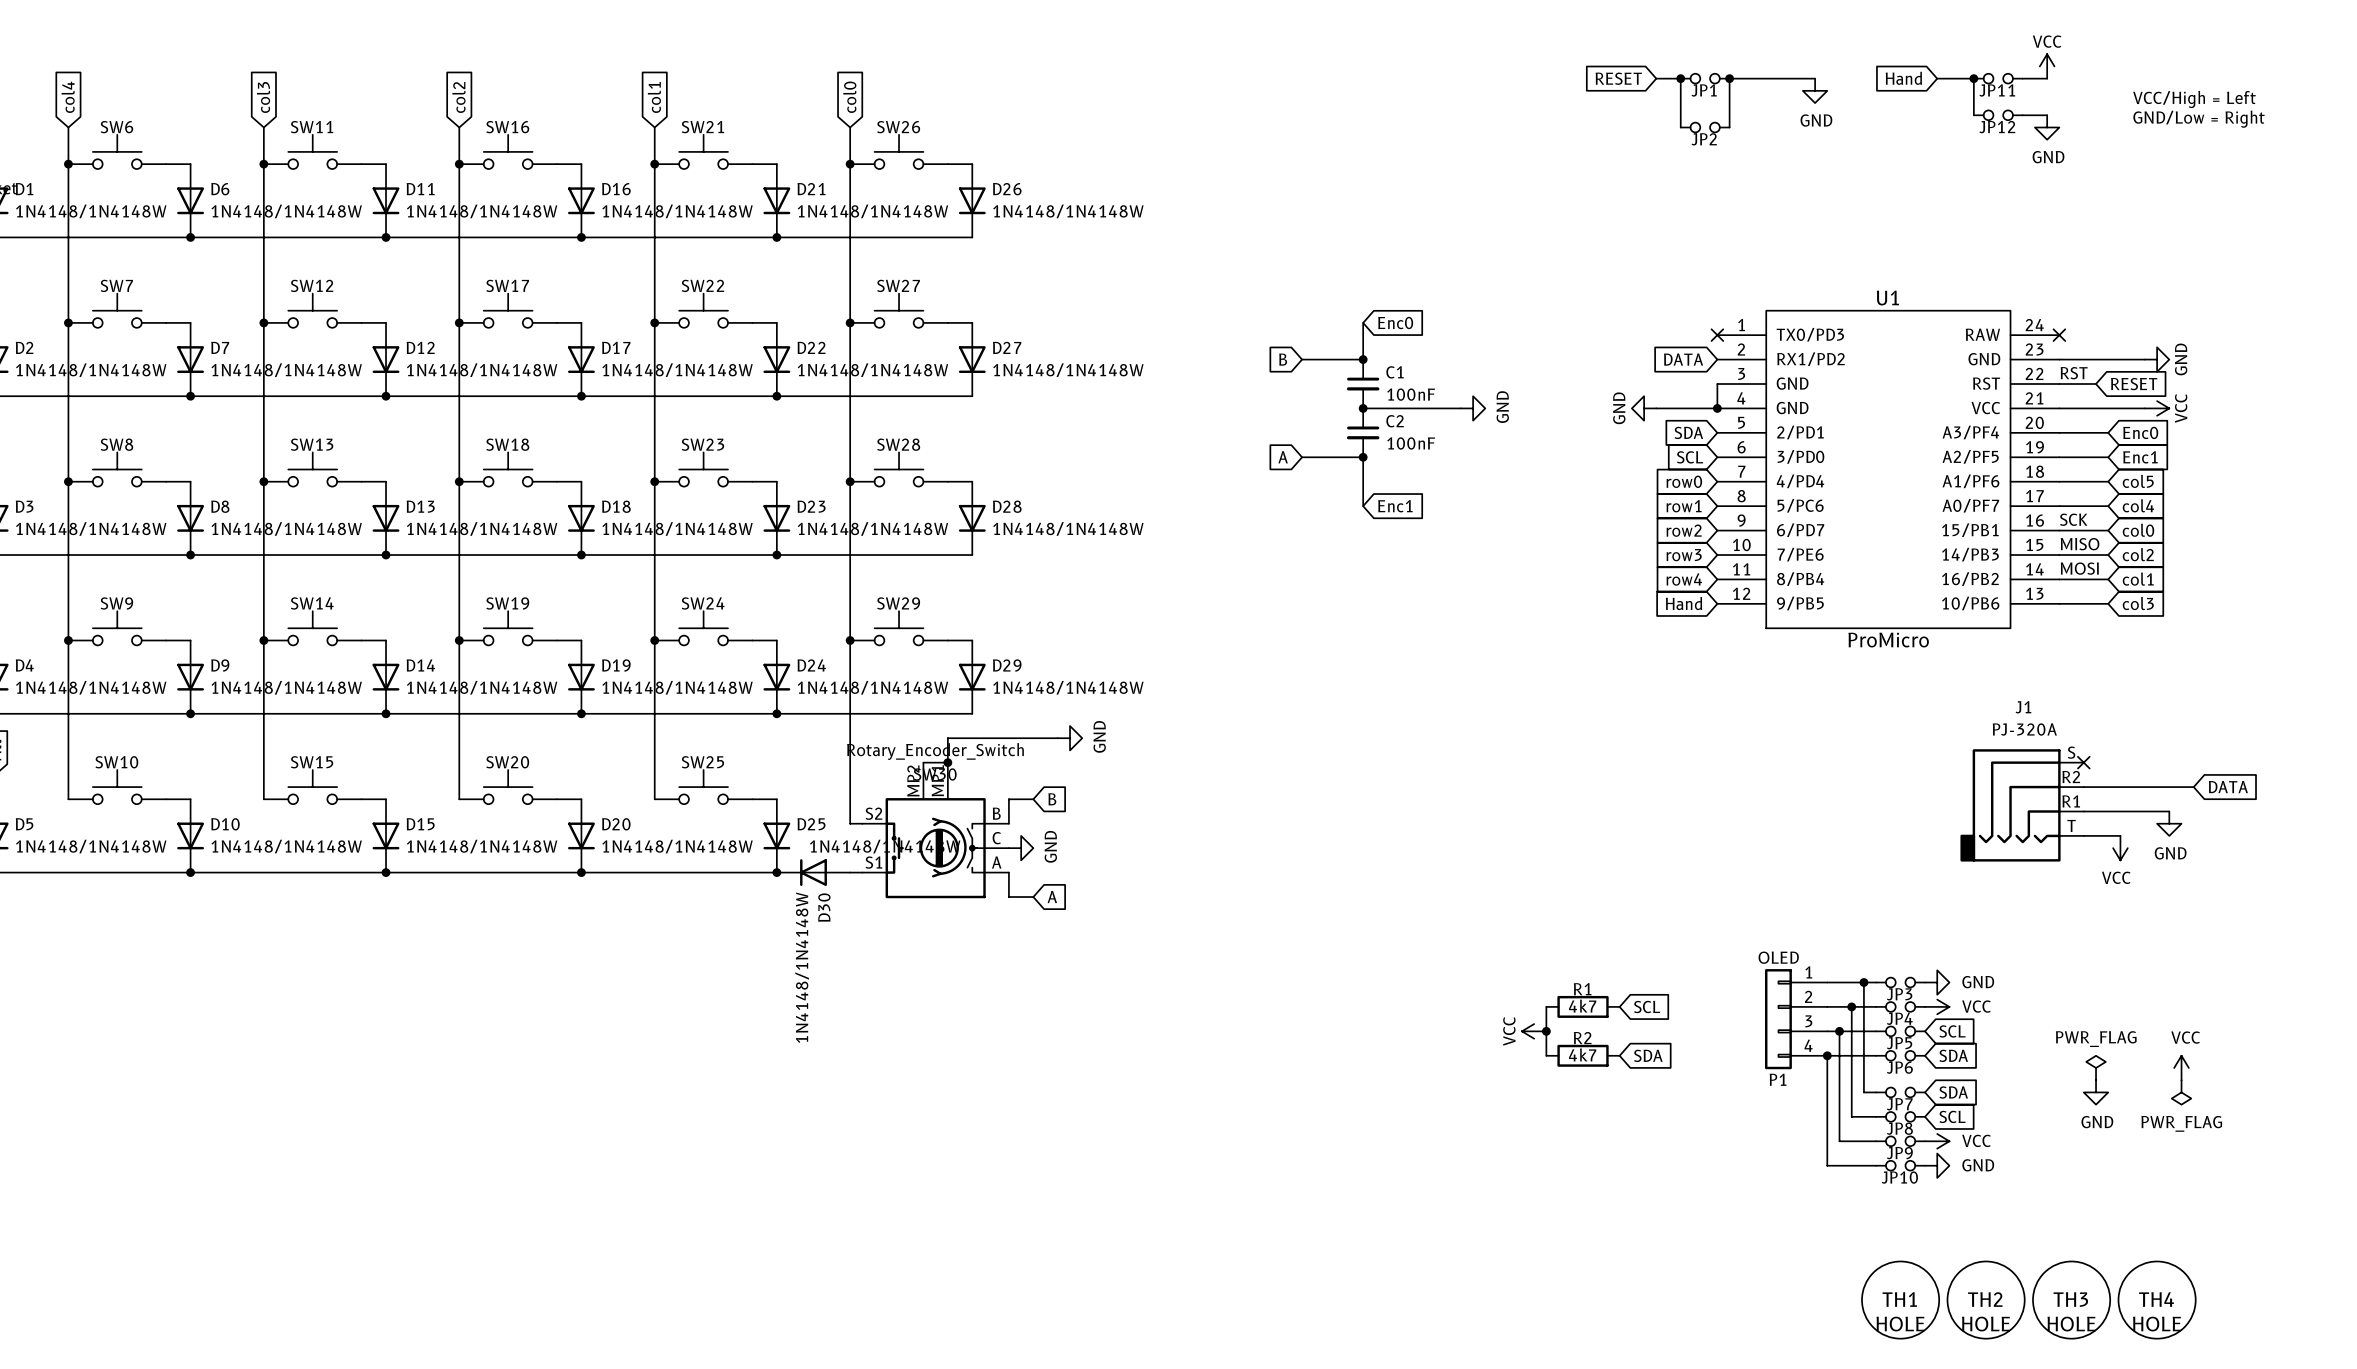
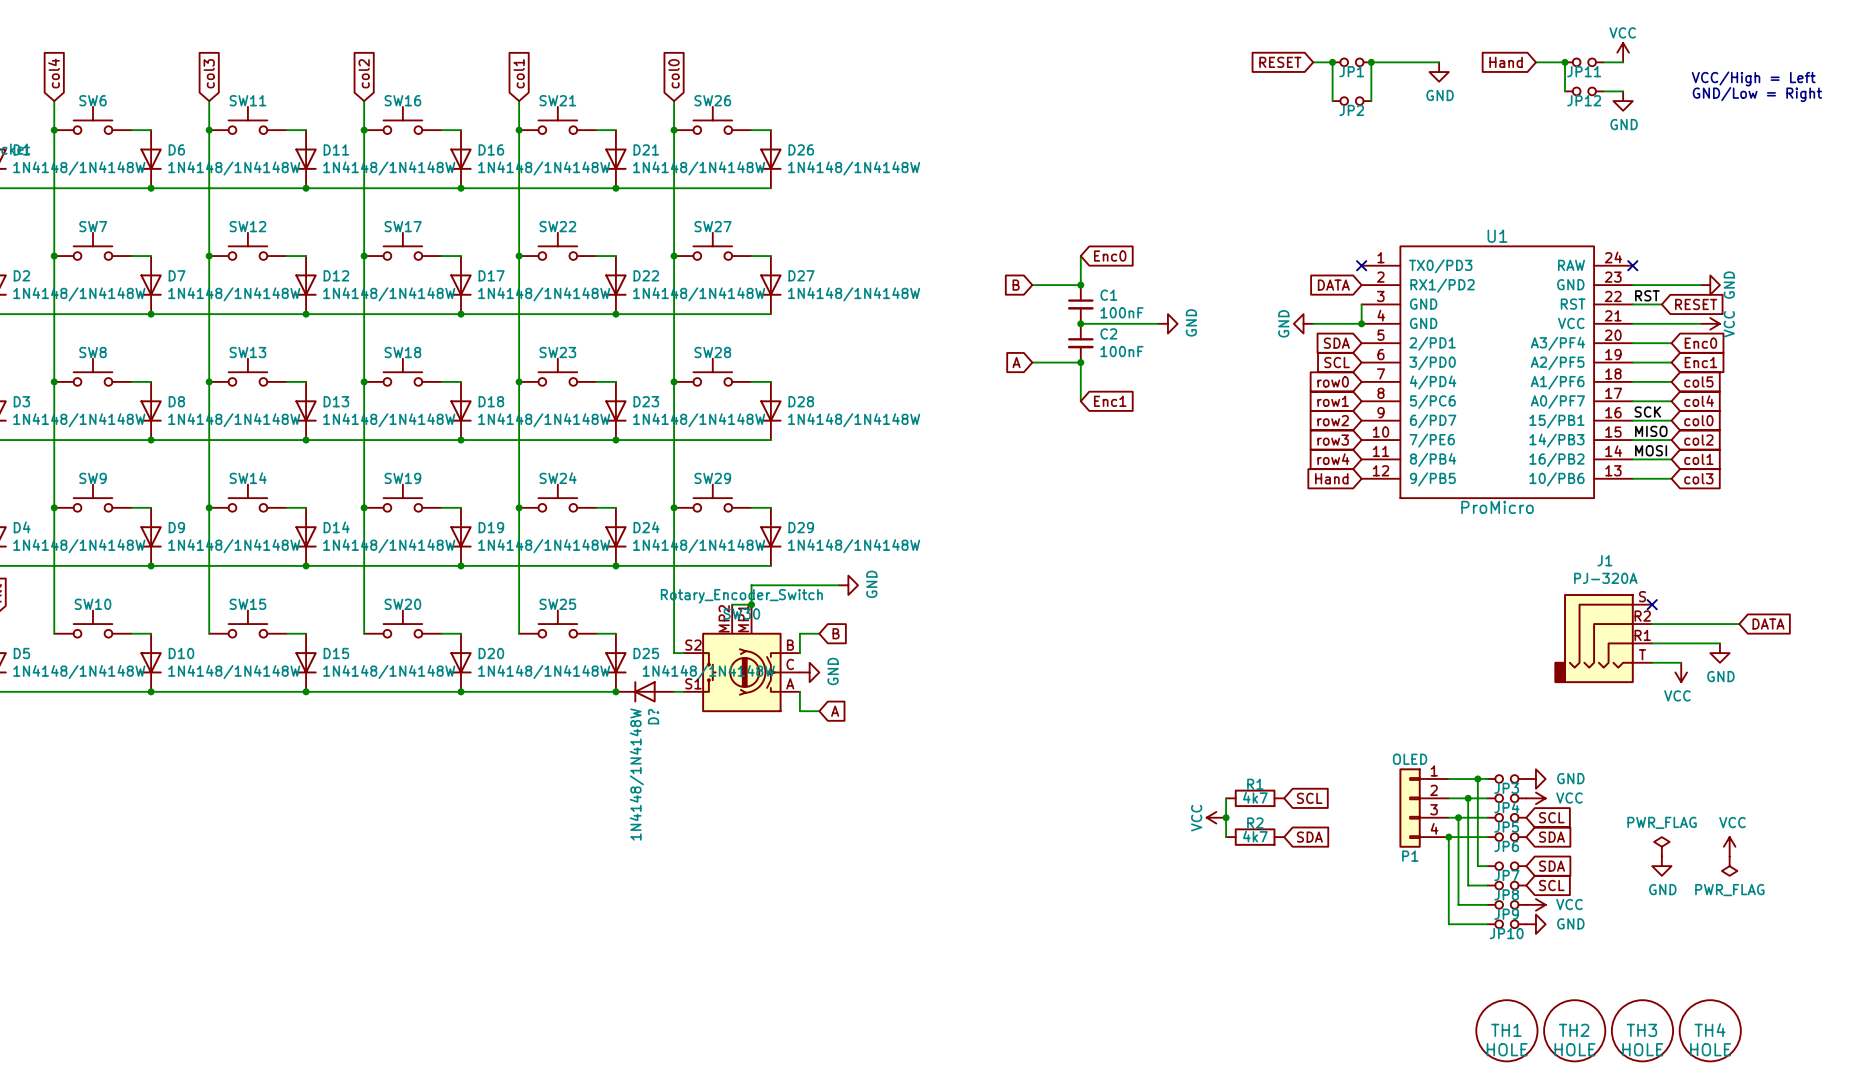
D30 name: D30 (824, 907) -> D? (653, 716)

